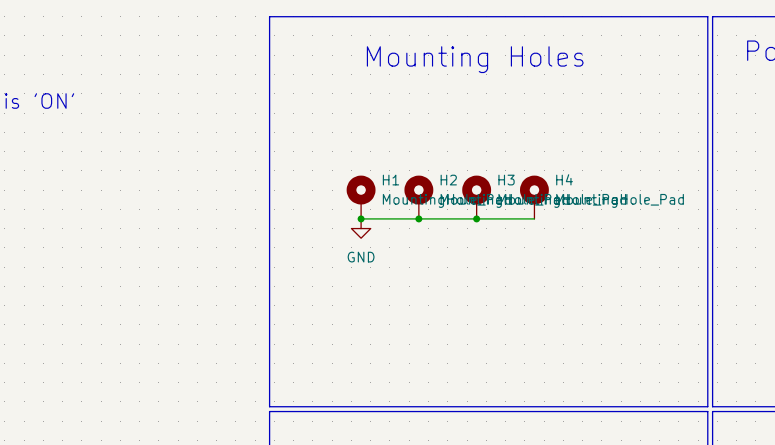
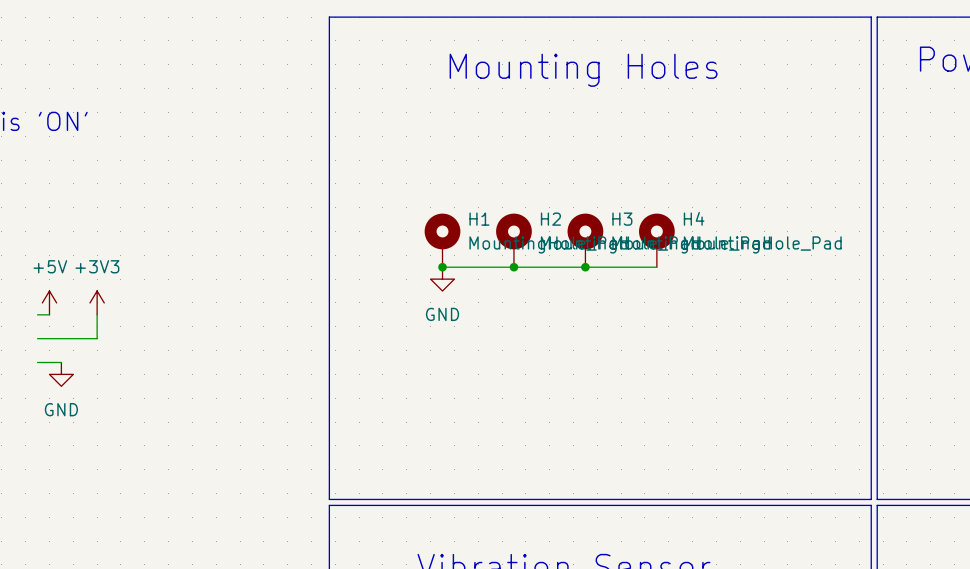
power symbol: none -> +5V (49, 302)
power symbol: none -> +3V3 (97, 302)
wire: none -> (37, 314) (49, 314)
wire: none -> (97, 314) (97, 338) (37, 338)
wire: none -> (37, 362) (61, 362)
power symbol: none -> GND (61, 374)

